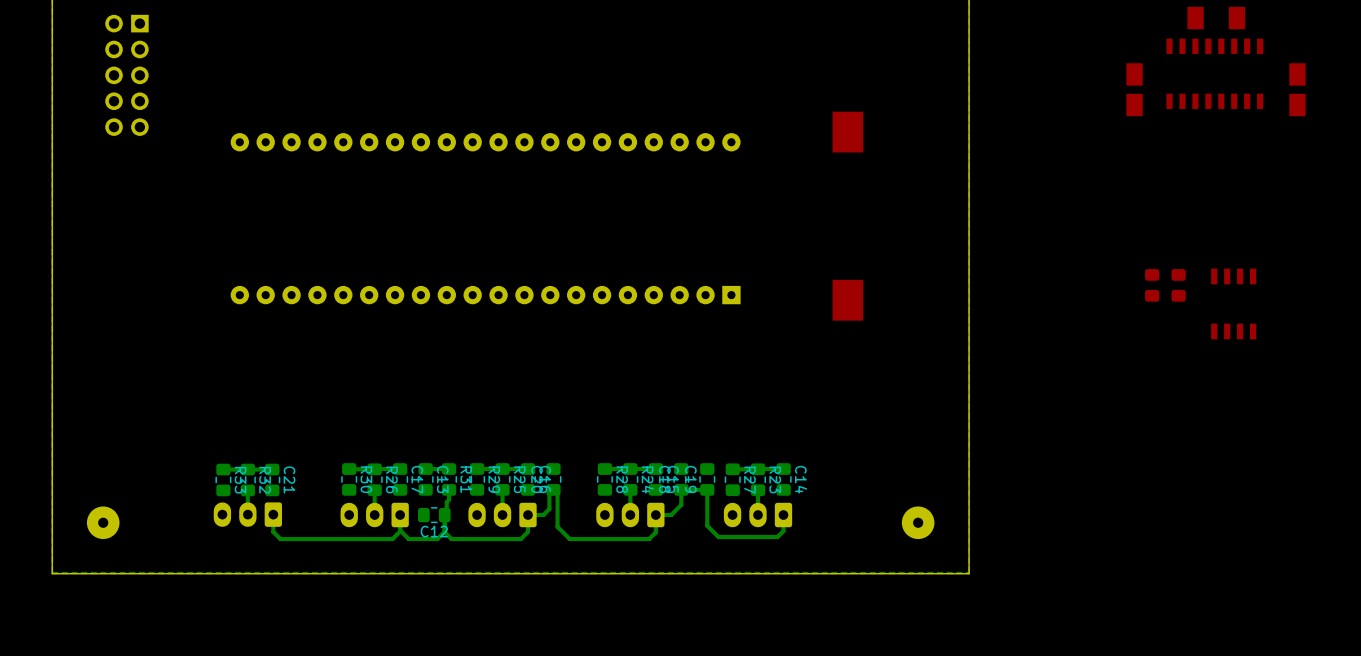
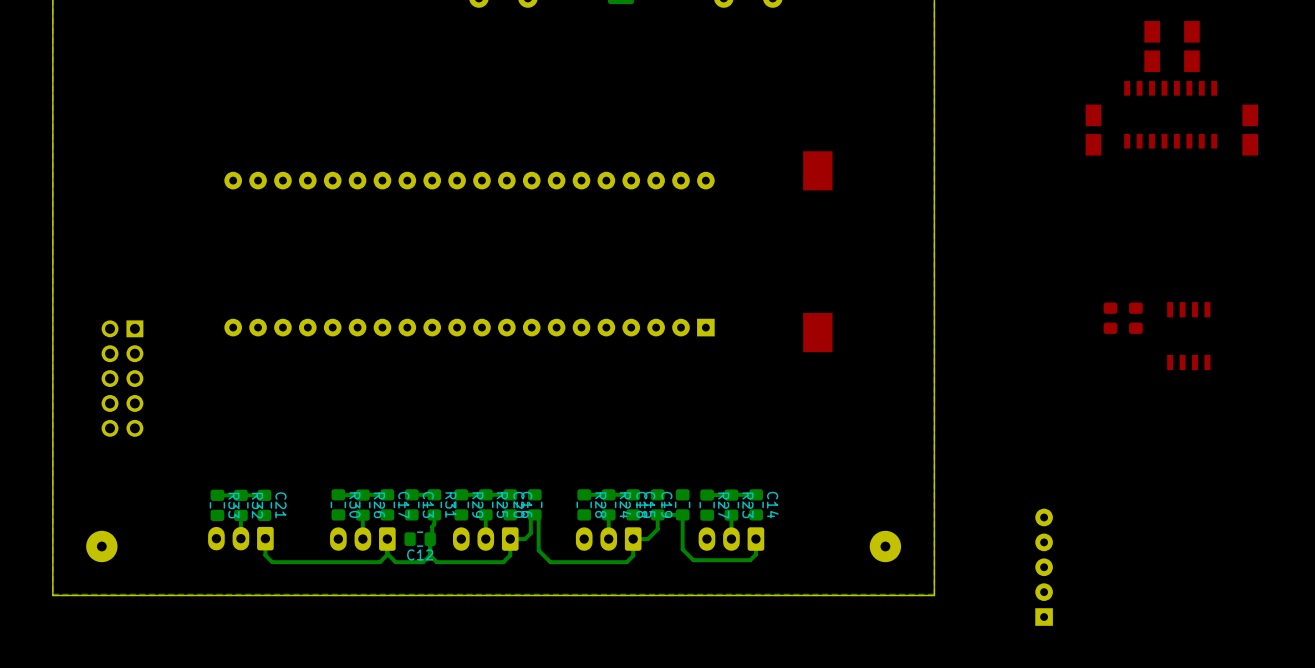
part: (126, 75) -> none
part: none -> (122, 378)
part: none -> (1044, 567)

